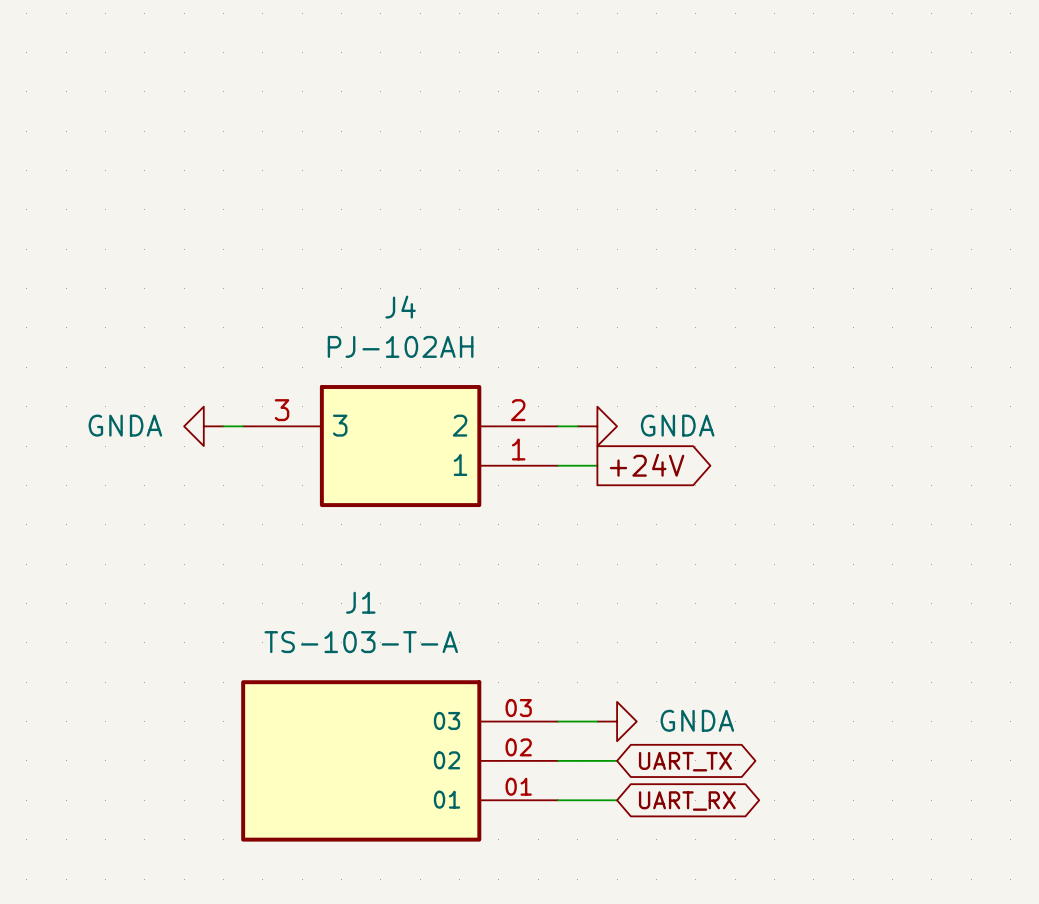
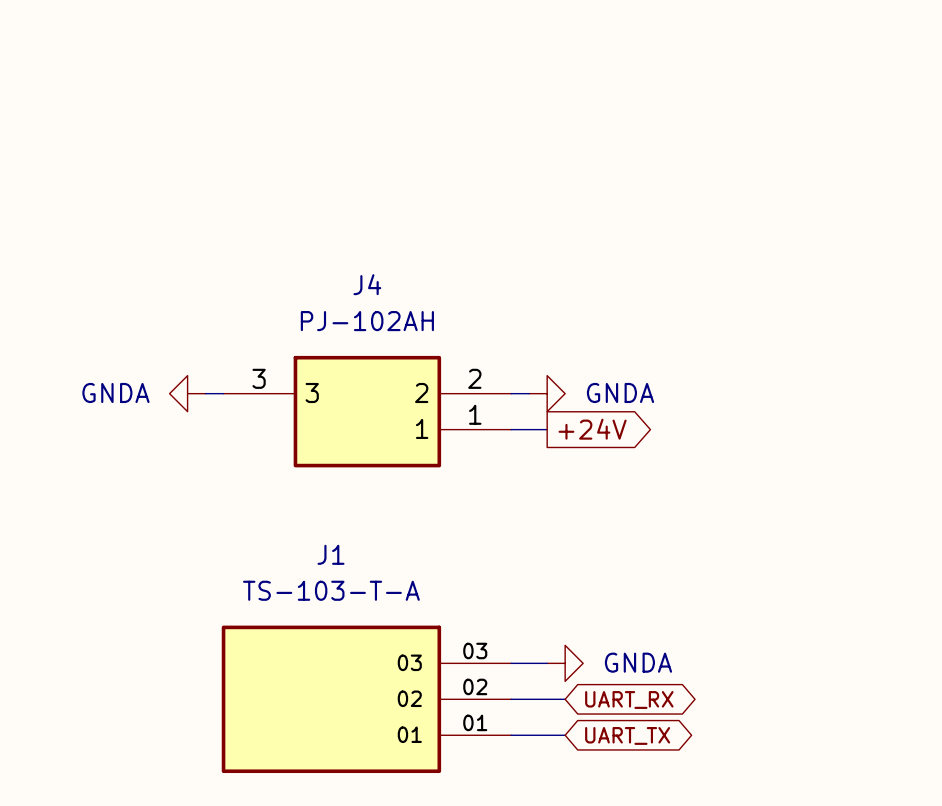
global label: UART_TX (685, 761) -> UART_RX (629, 699)
global label: UART_RX (687, 801) -> UART_TX (627, 735)

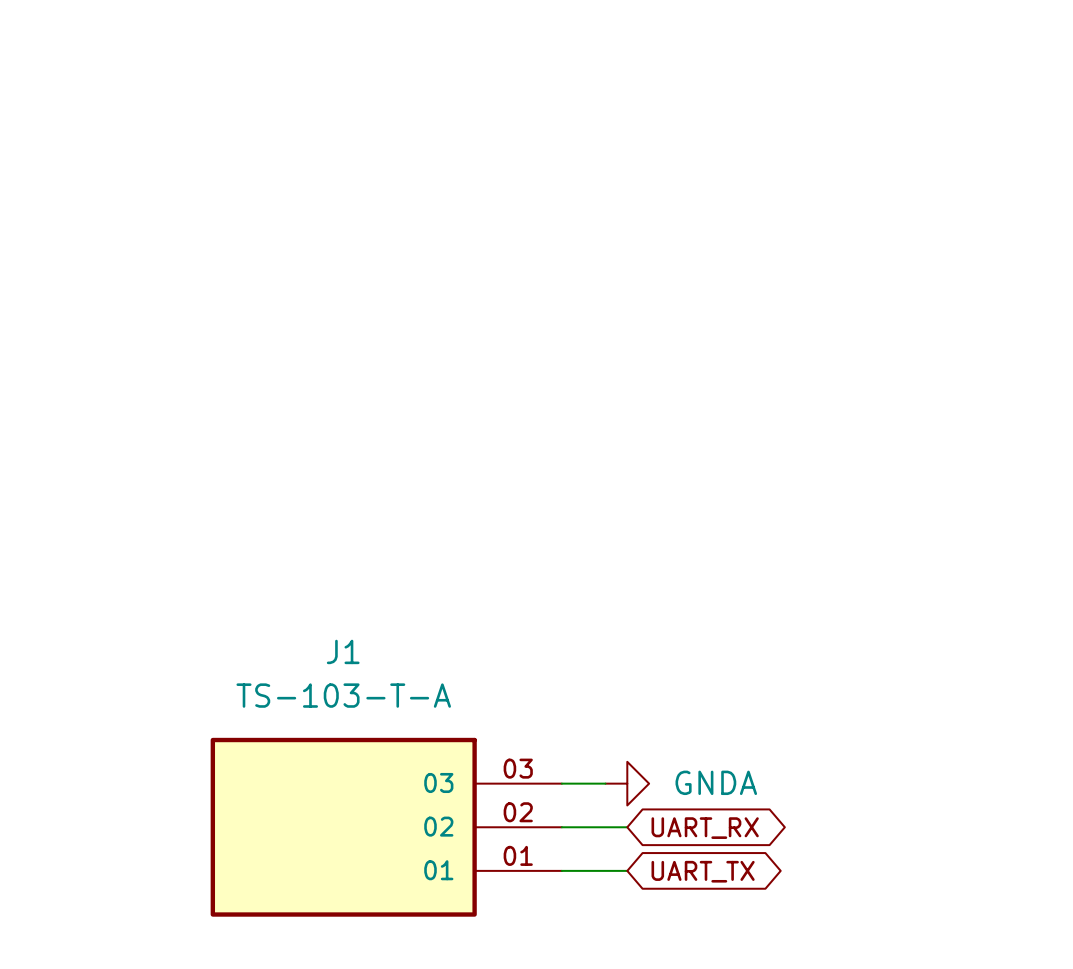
power symbol: GNDA (187, 393) -> none
wire: (205, 393) (223, 393) -> none
wire: (511, 393) (529, 393) -> none
power symbol: GNDA (547, 393) -> none
J4: PJ-102AH (367, 411) -> none
wire: (511, 429) (547, 429) -> none
global label: +24V (592, 429) -> none

